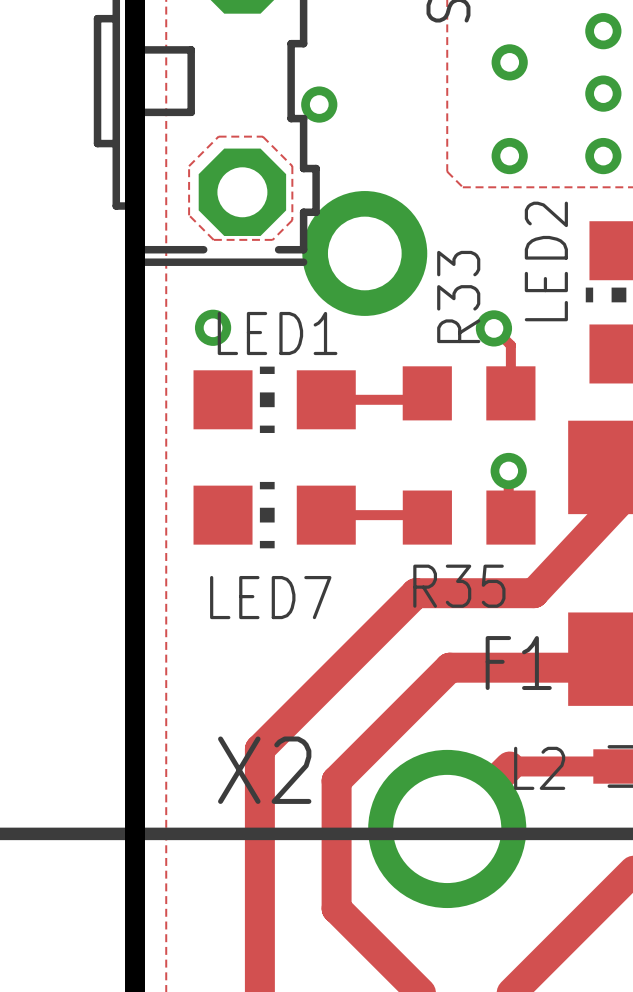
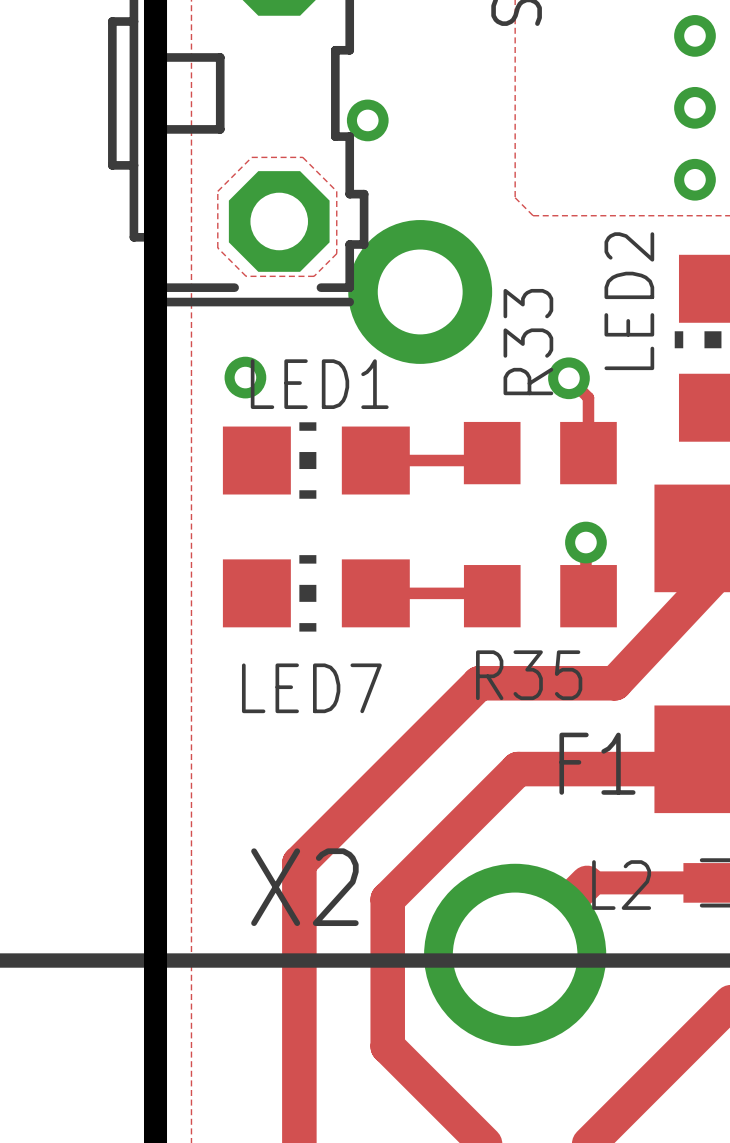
via: (509, 62) -> none
via: (509, 156) -> none

